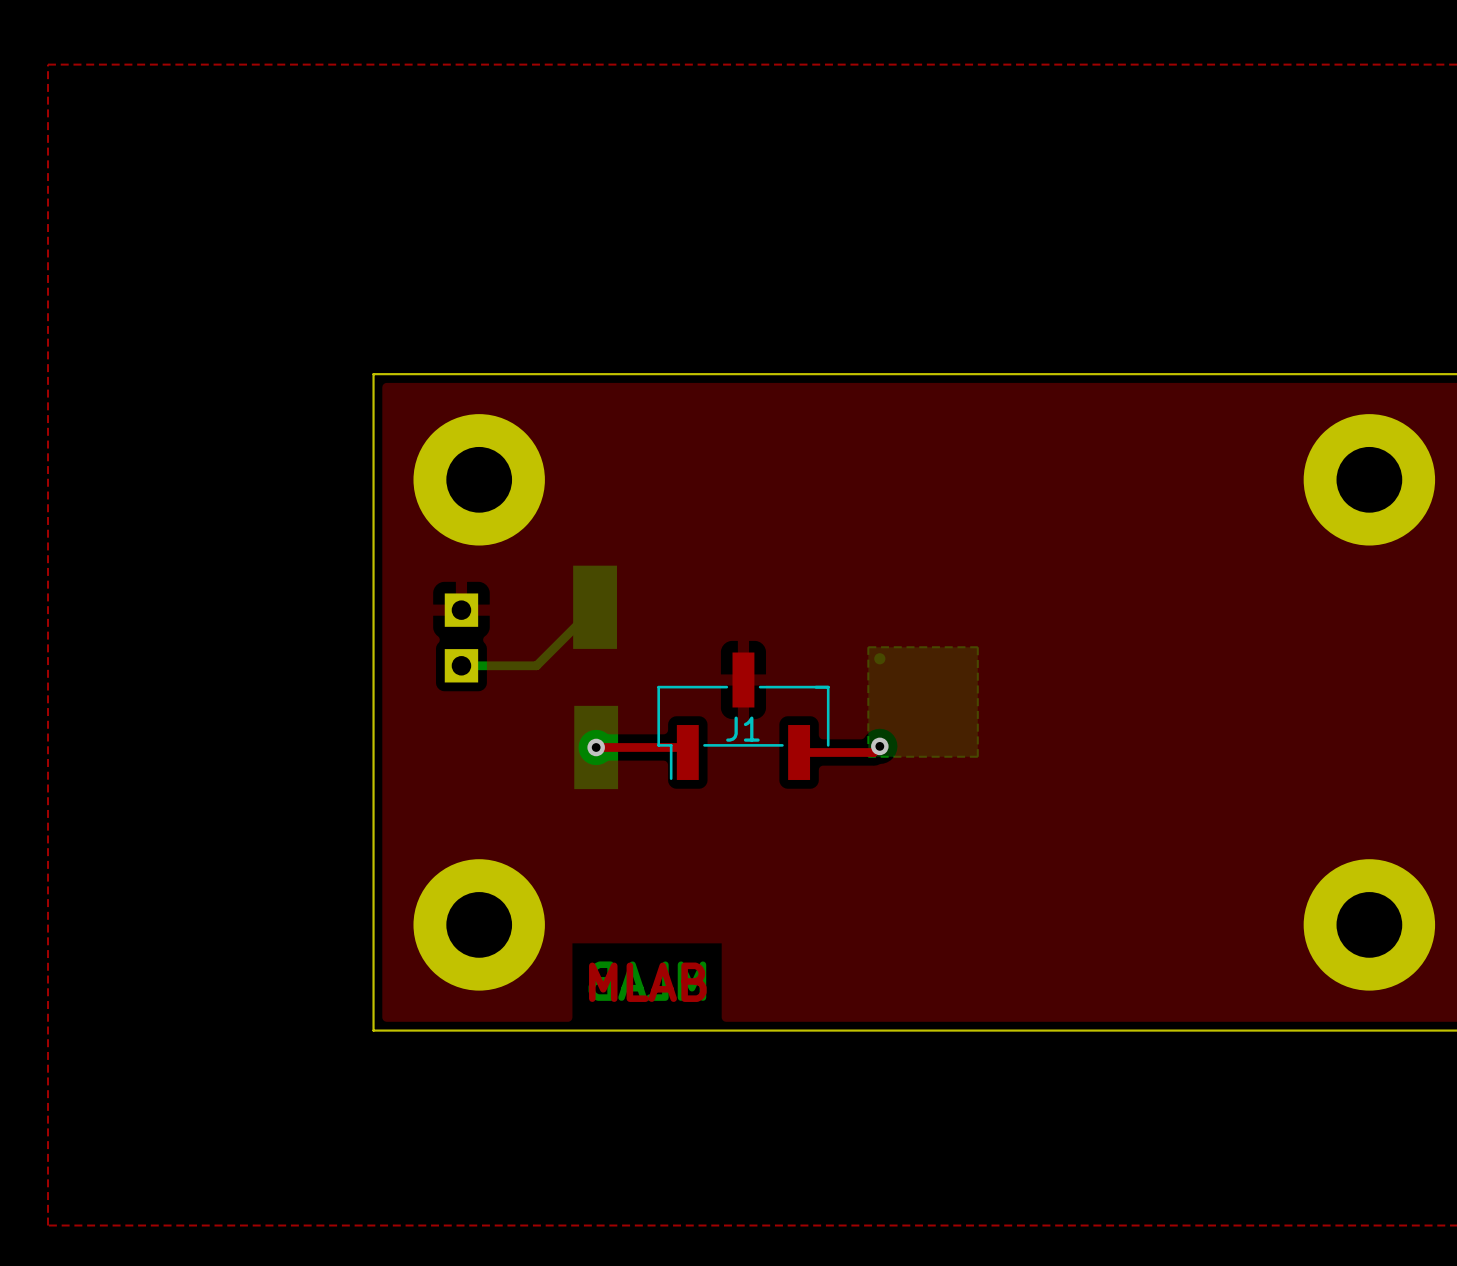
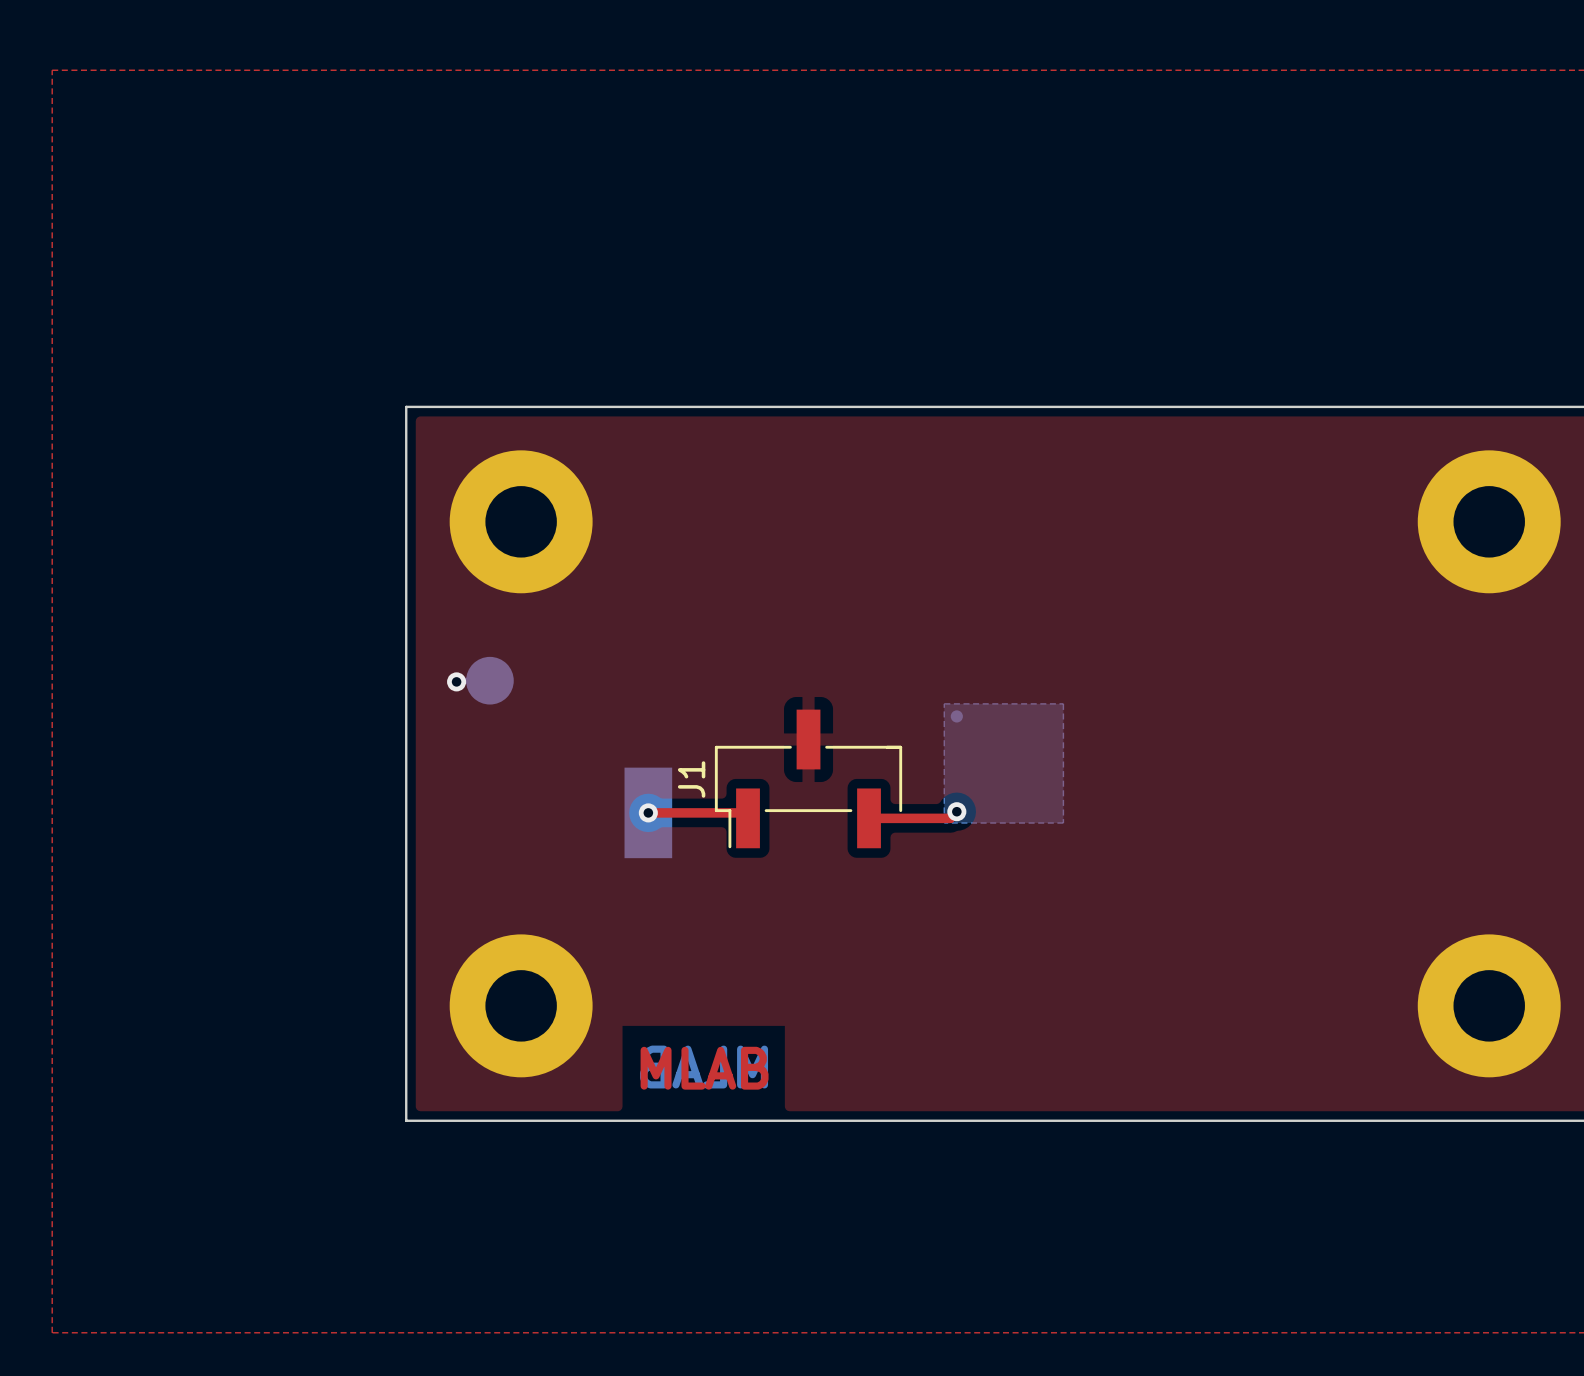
part footprint: [444, 593, 479, 683] -> [466, 656, 514, 705]
bottom track: (595, 607) (536, 665) (461, 665) -> none
part: (595, 607) -> none
via: none -> (456, 681)
J1 name rotation: 0° (742, 729) -> 90° counterclockwise (691, 779)
J1 name position: J1 (742, 729) -> J1 (691, 779)

